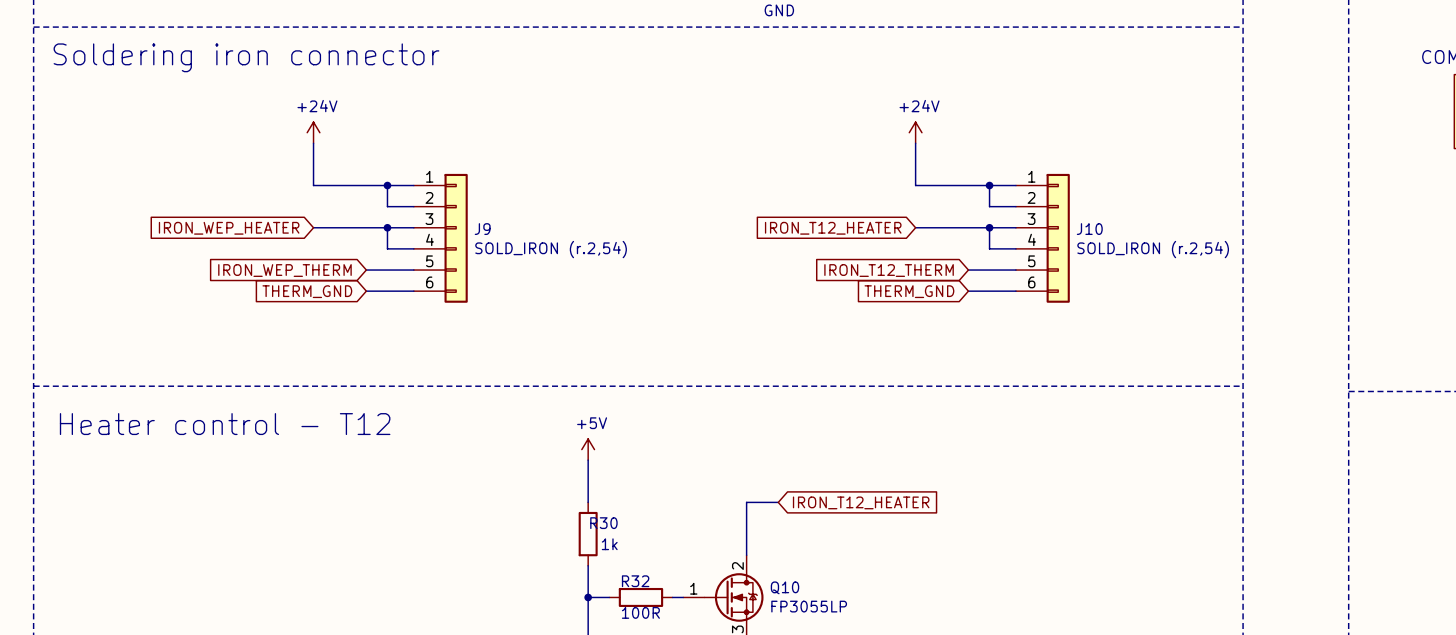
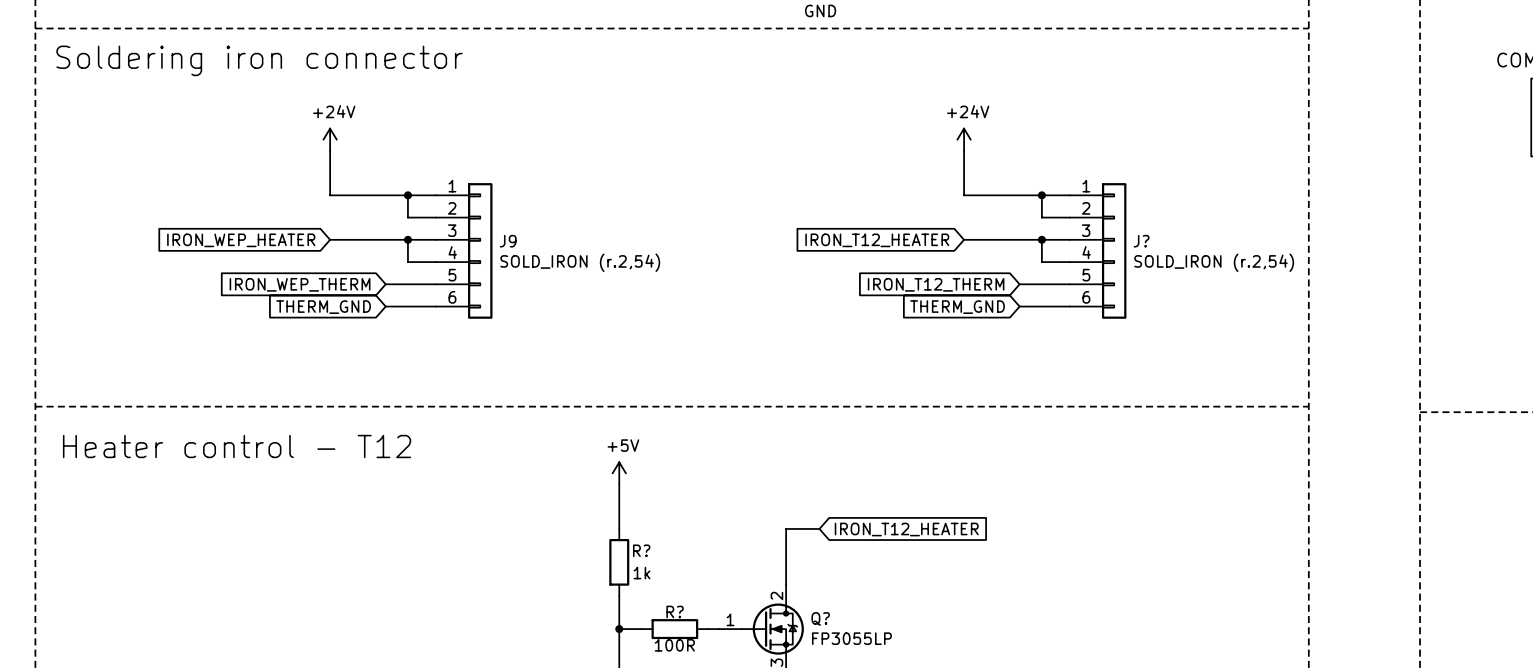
J10 name: J10 (1089, 229) -> J? (1141, 241)
R30 name: R30 (603, 523) -> R? (641, 550)
R32 name: R32 (635, 581) -> R? (675, 611)
Q10 name: Q10 (785, 587) -> Q? (820, 618)

